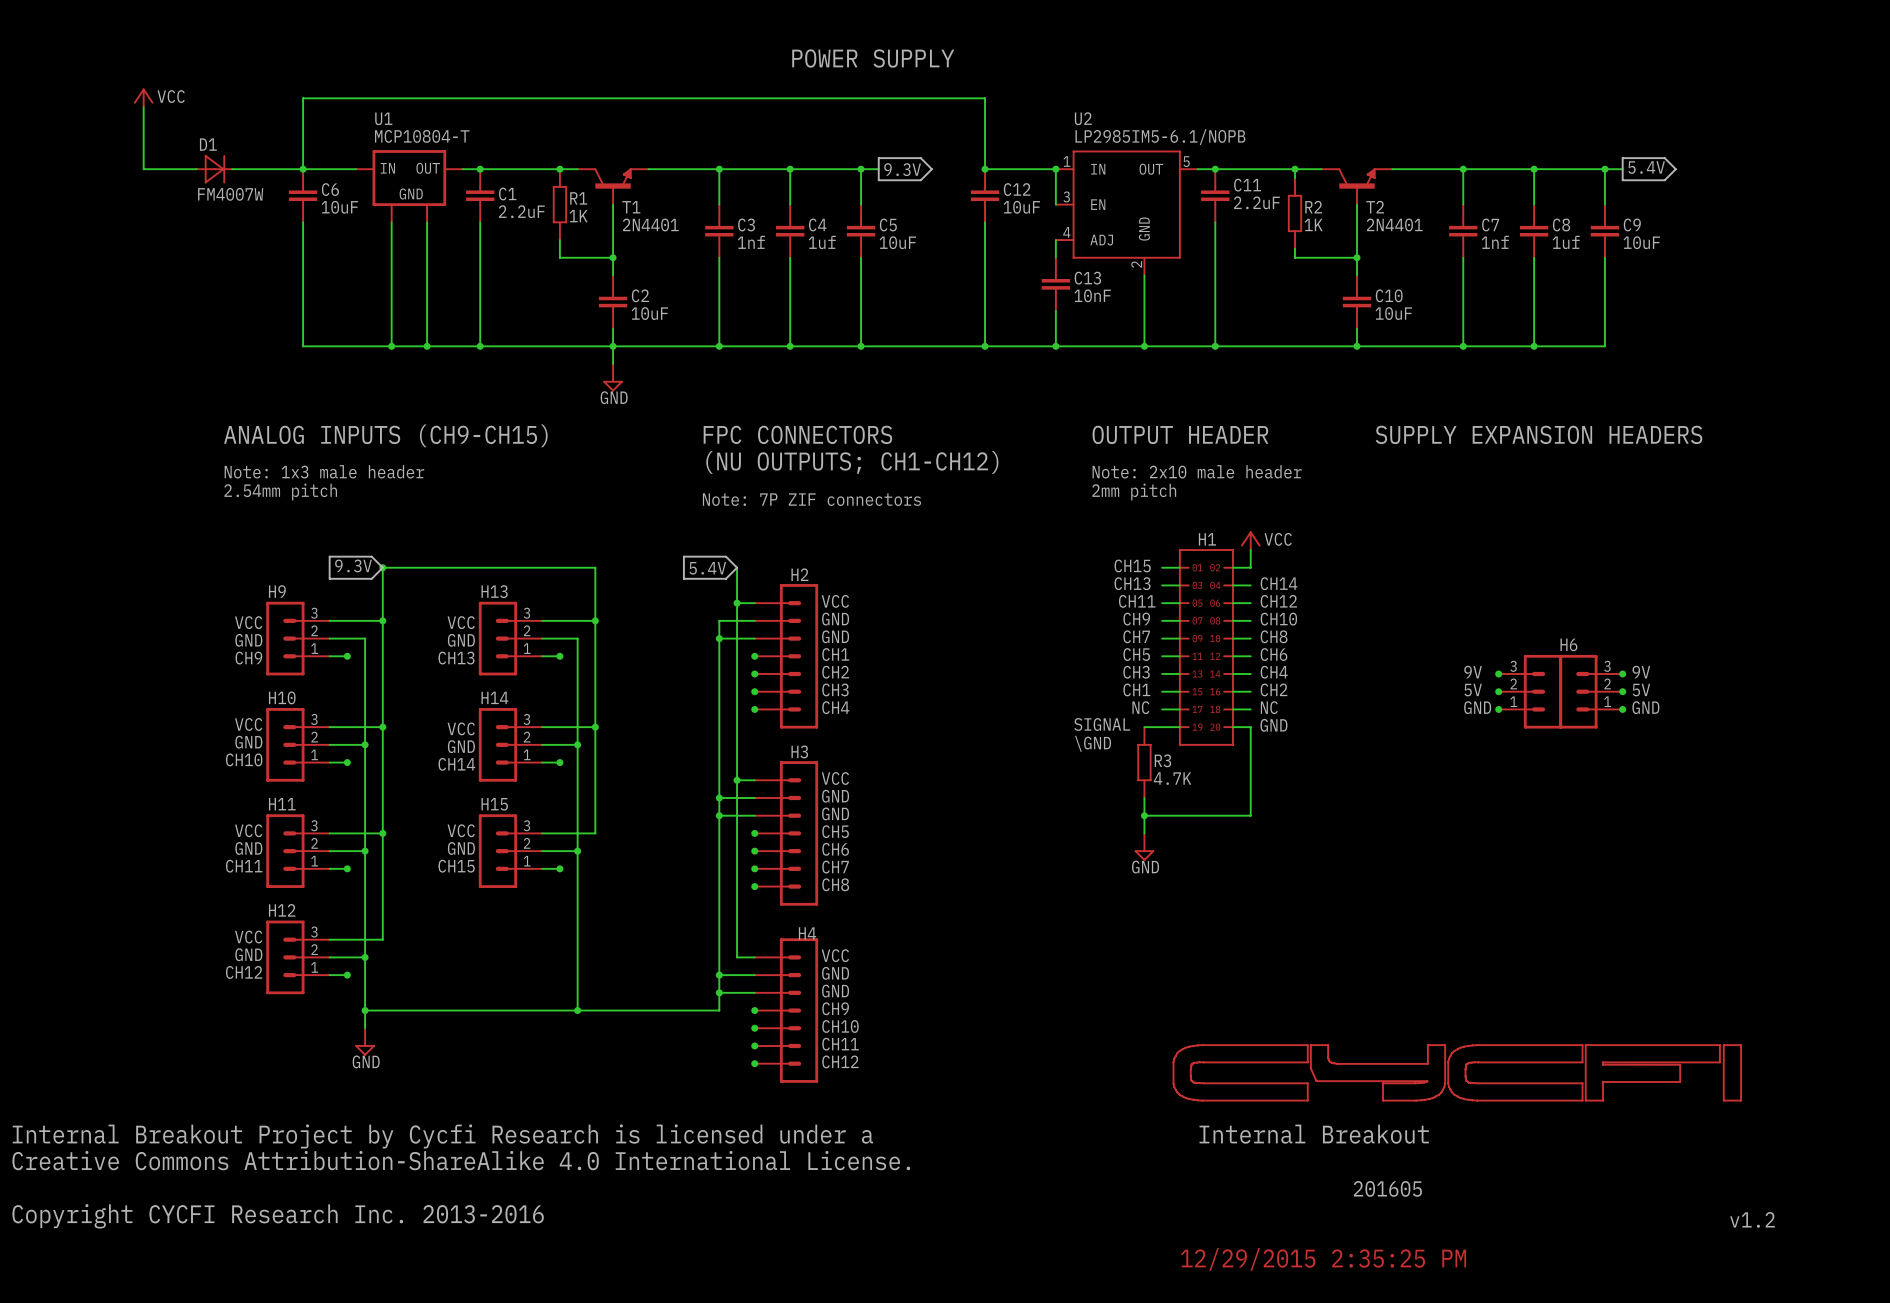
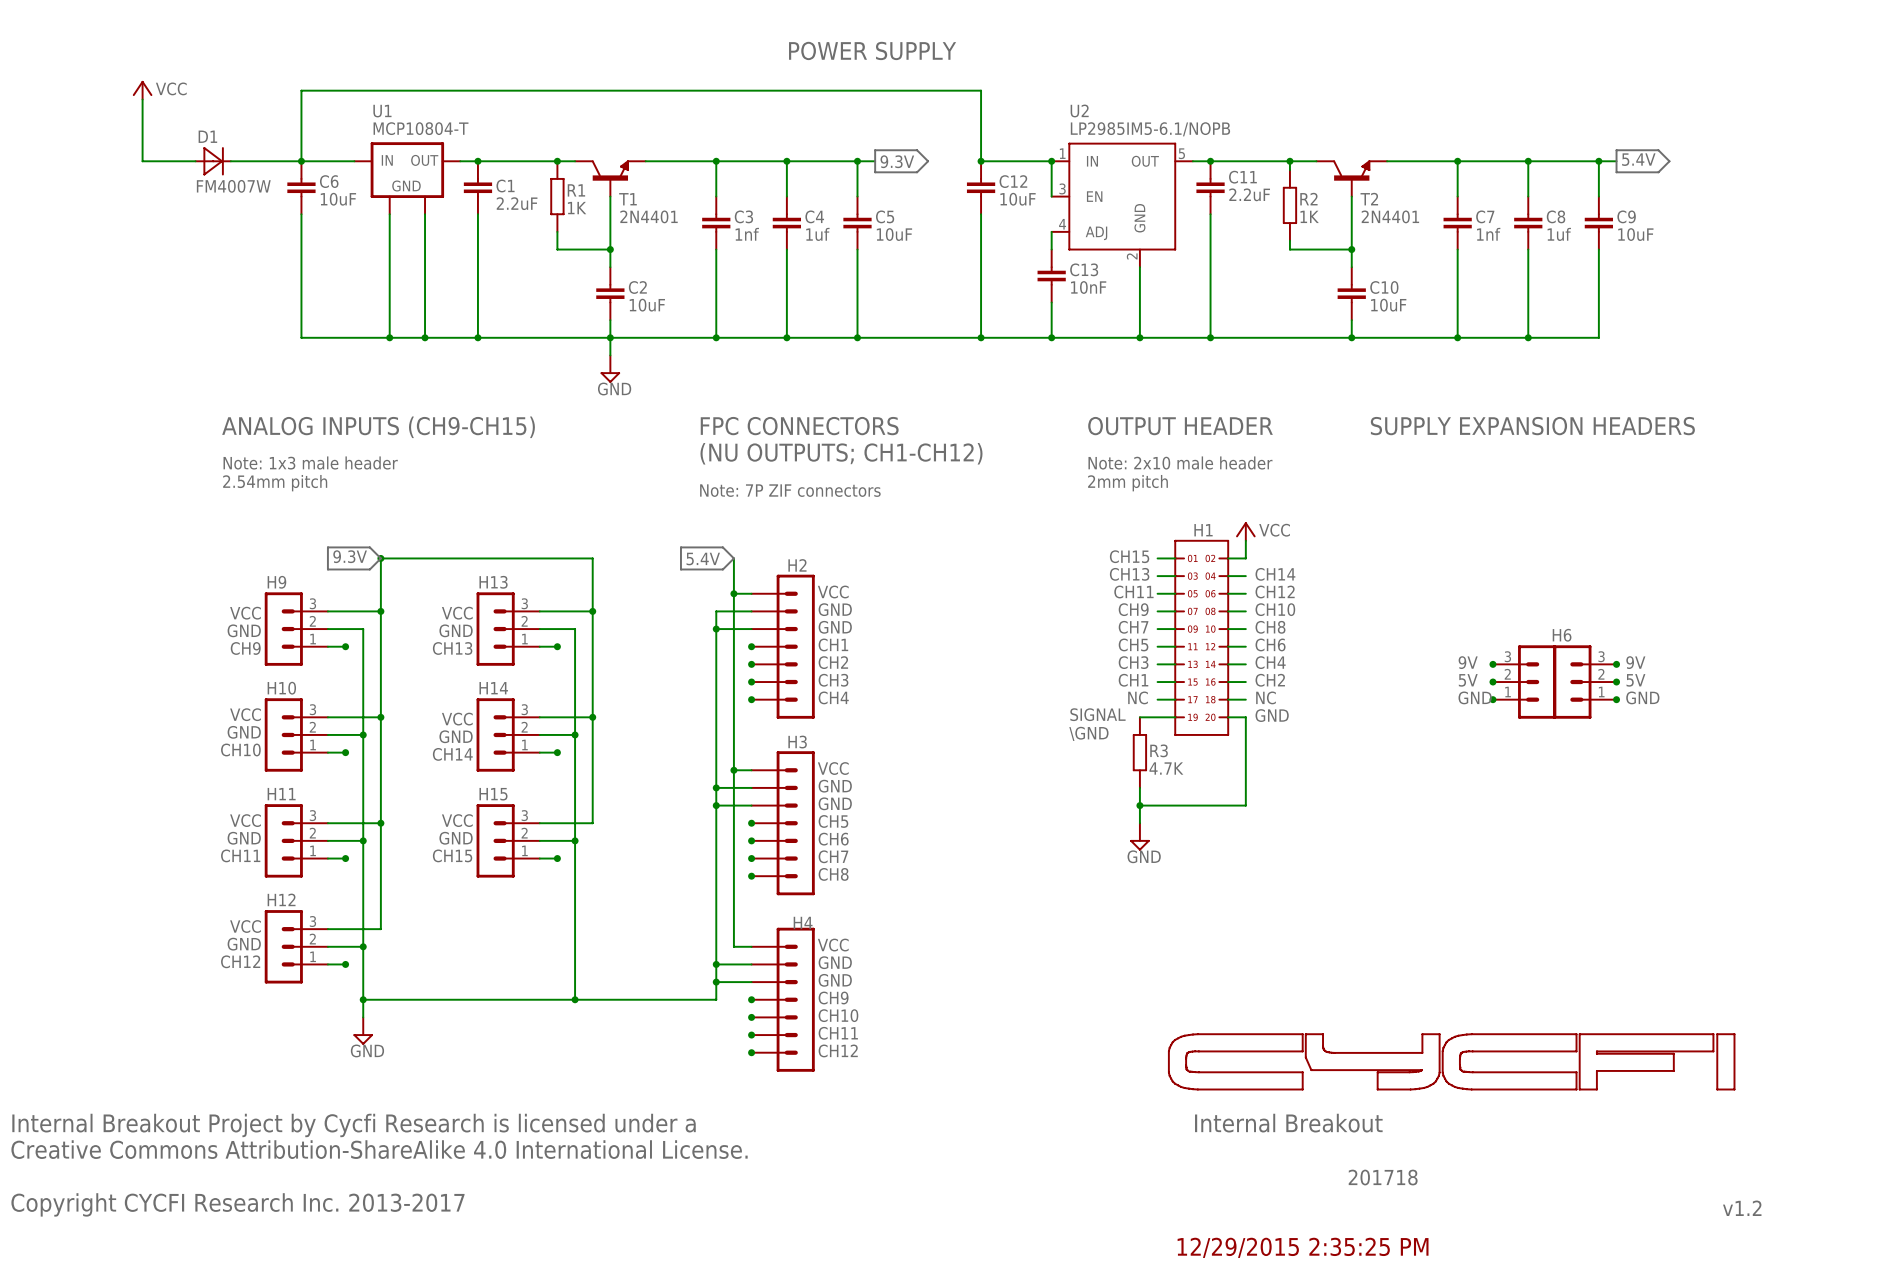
text: 201605 (1387, 1188) -> 201718 (1383, 1177)
text: Copyright CYCFI Research Inc. 2013-2016 (278, 1216) -> Copyright CYCFI Research Inc. 2013-2017 (237, 1204)

